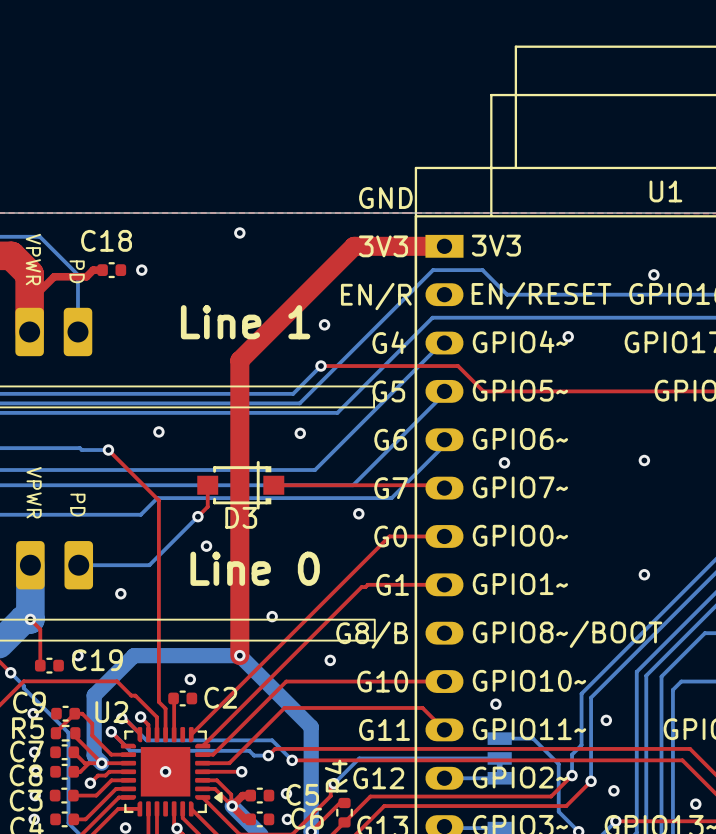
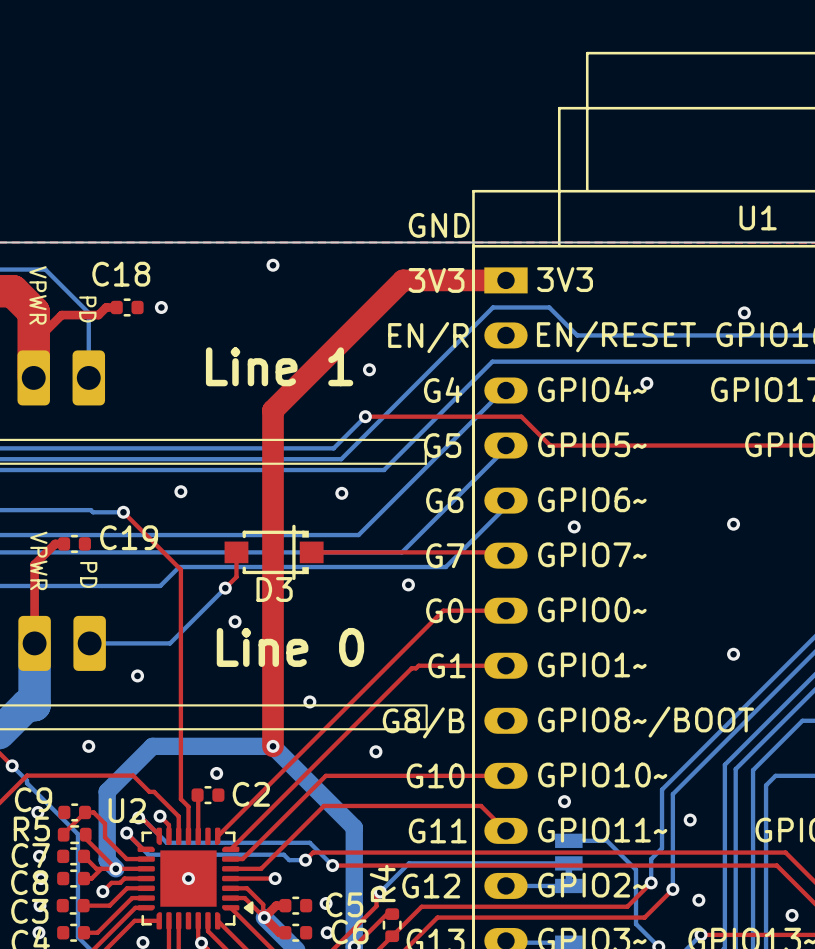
top track: none -> (64, 543) (55, 543) (34, 564) (34, 643)
top track: (30, 619) (40, 629) (40, 665) -> none
via: (30, 619) -> none
C19 position: (49, 665) -> (74, 543)

